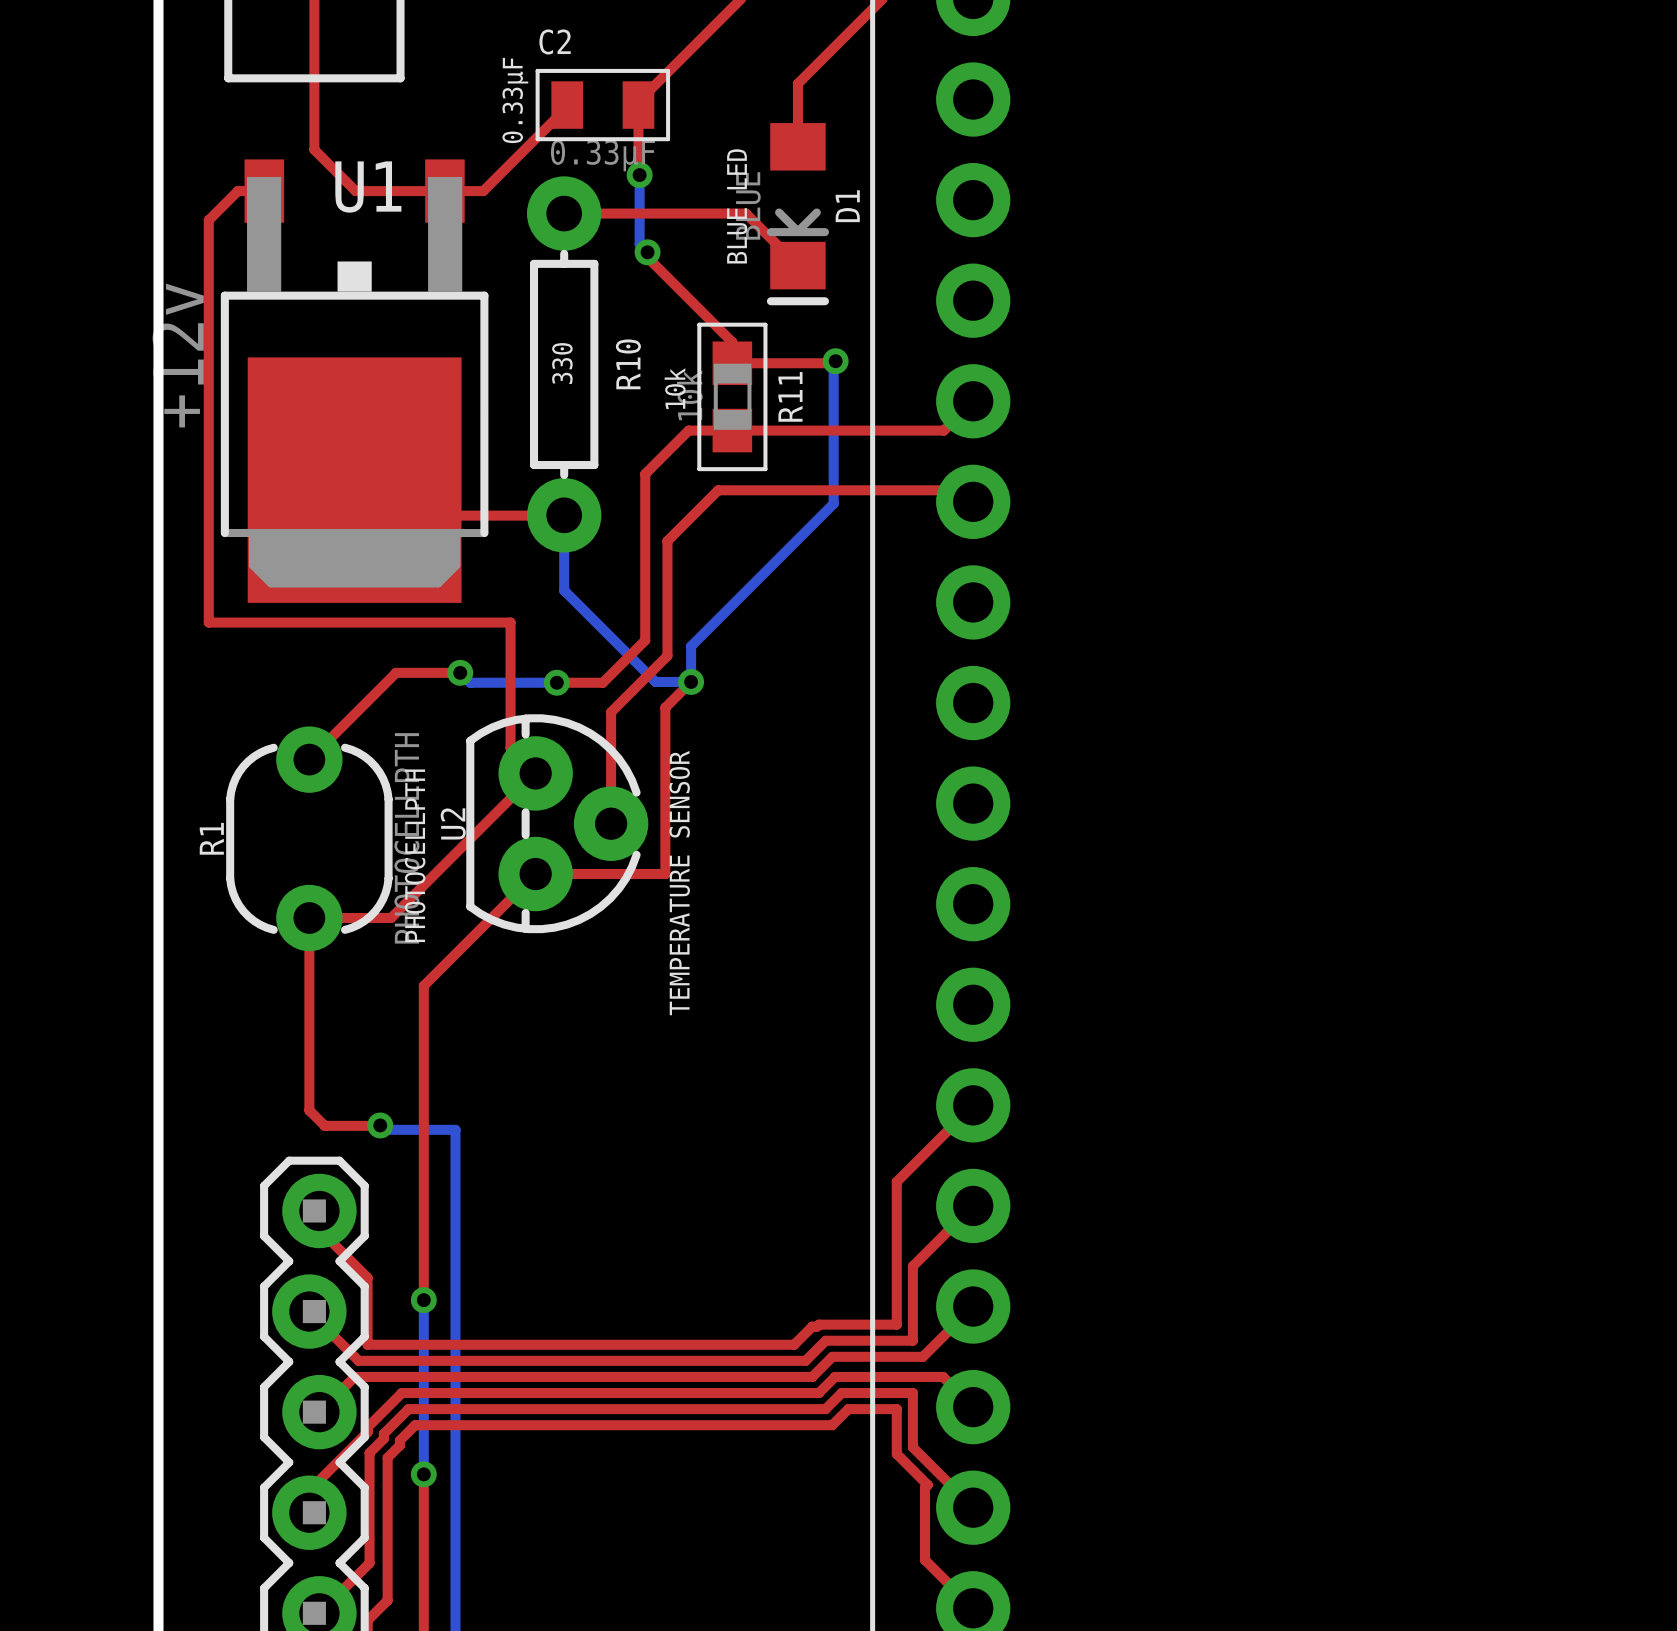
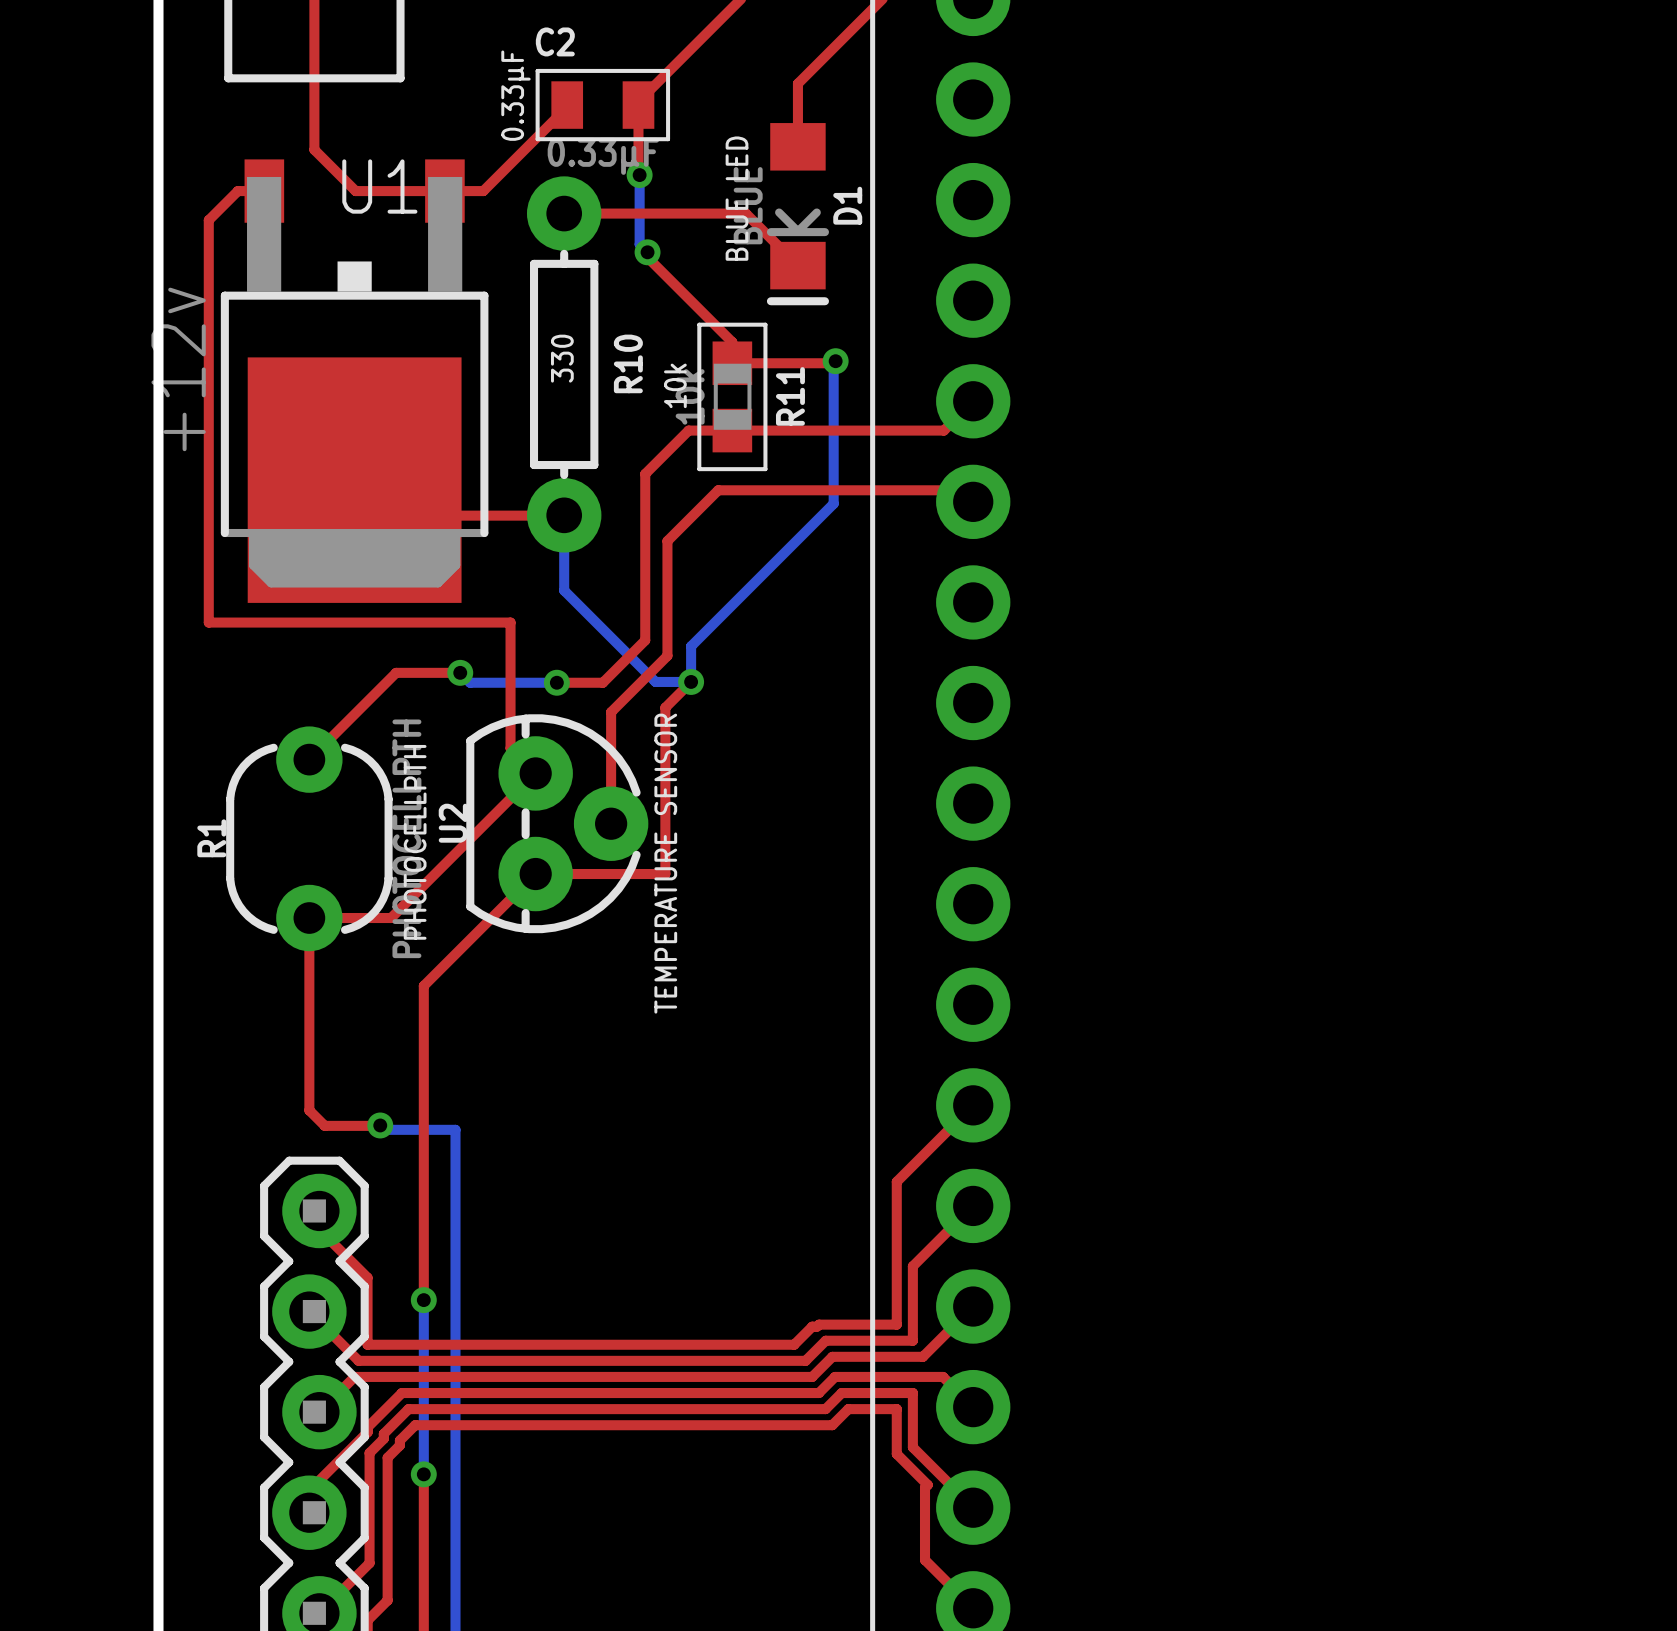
text position: TEMPERATURE SENSOR (679, 883) -> TEMPERATURE SENSOR (665, 863)

